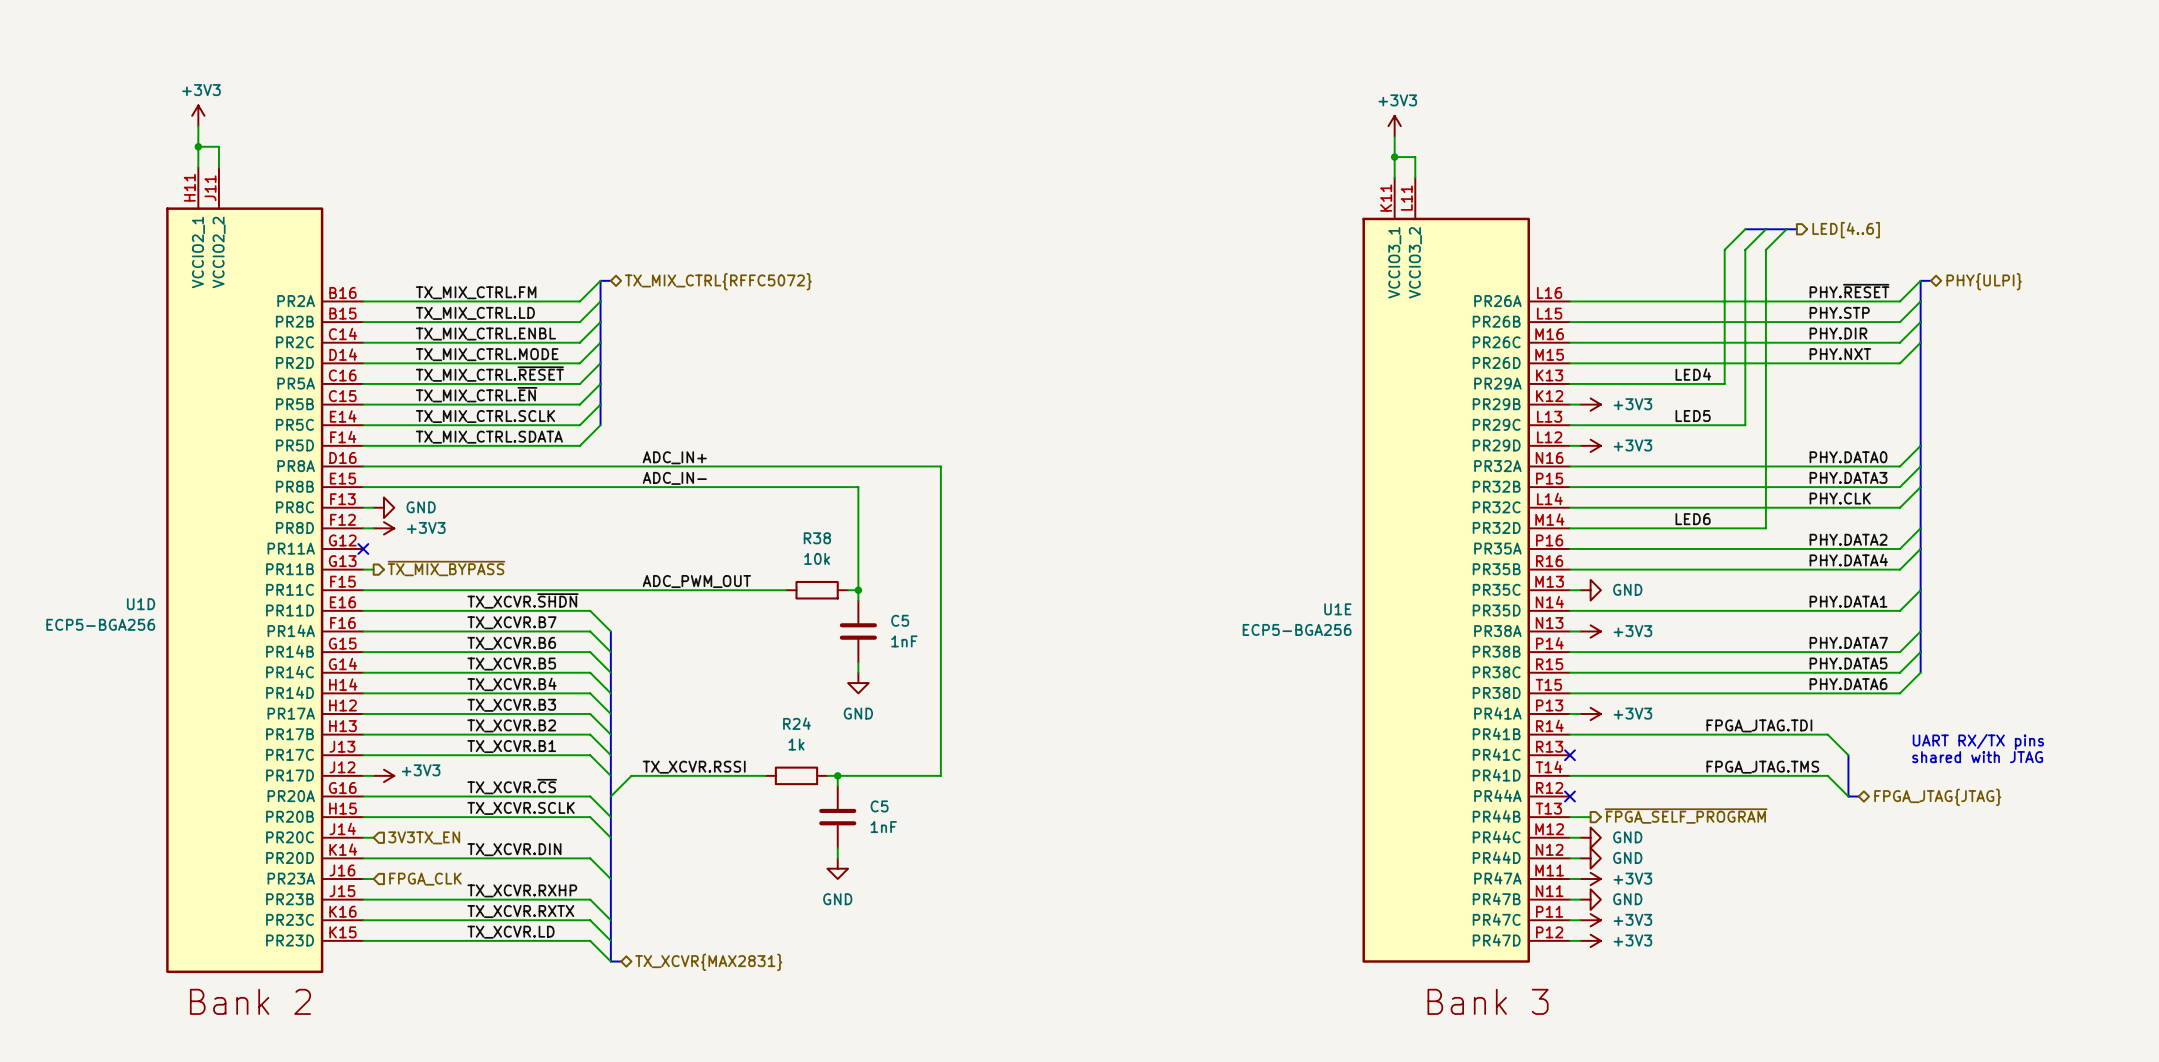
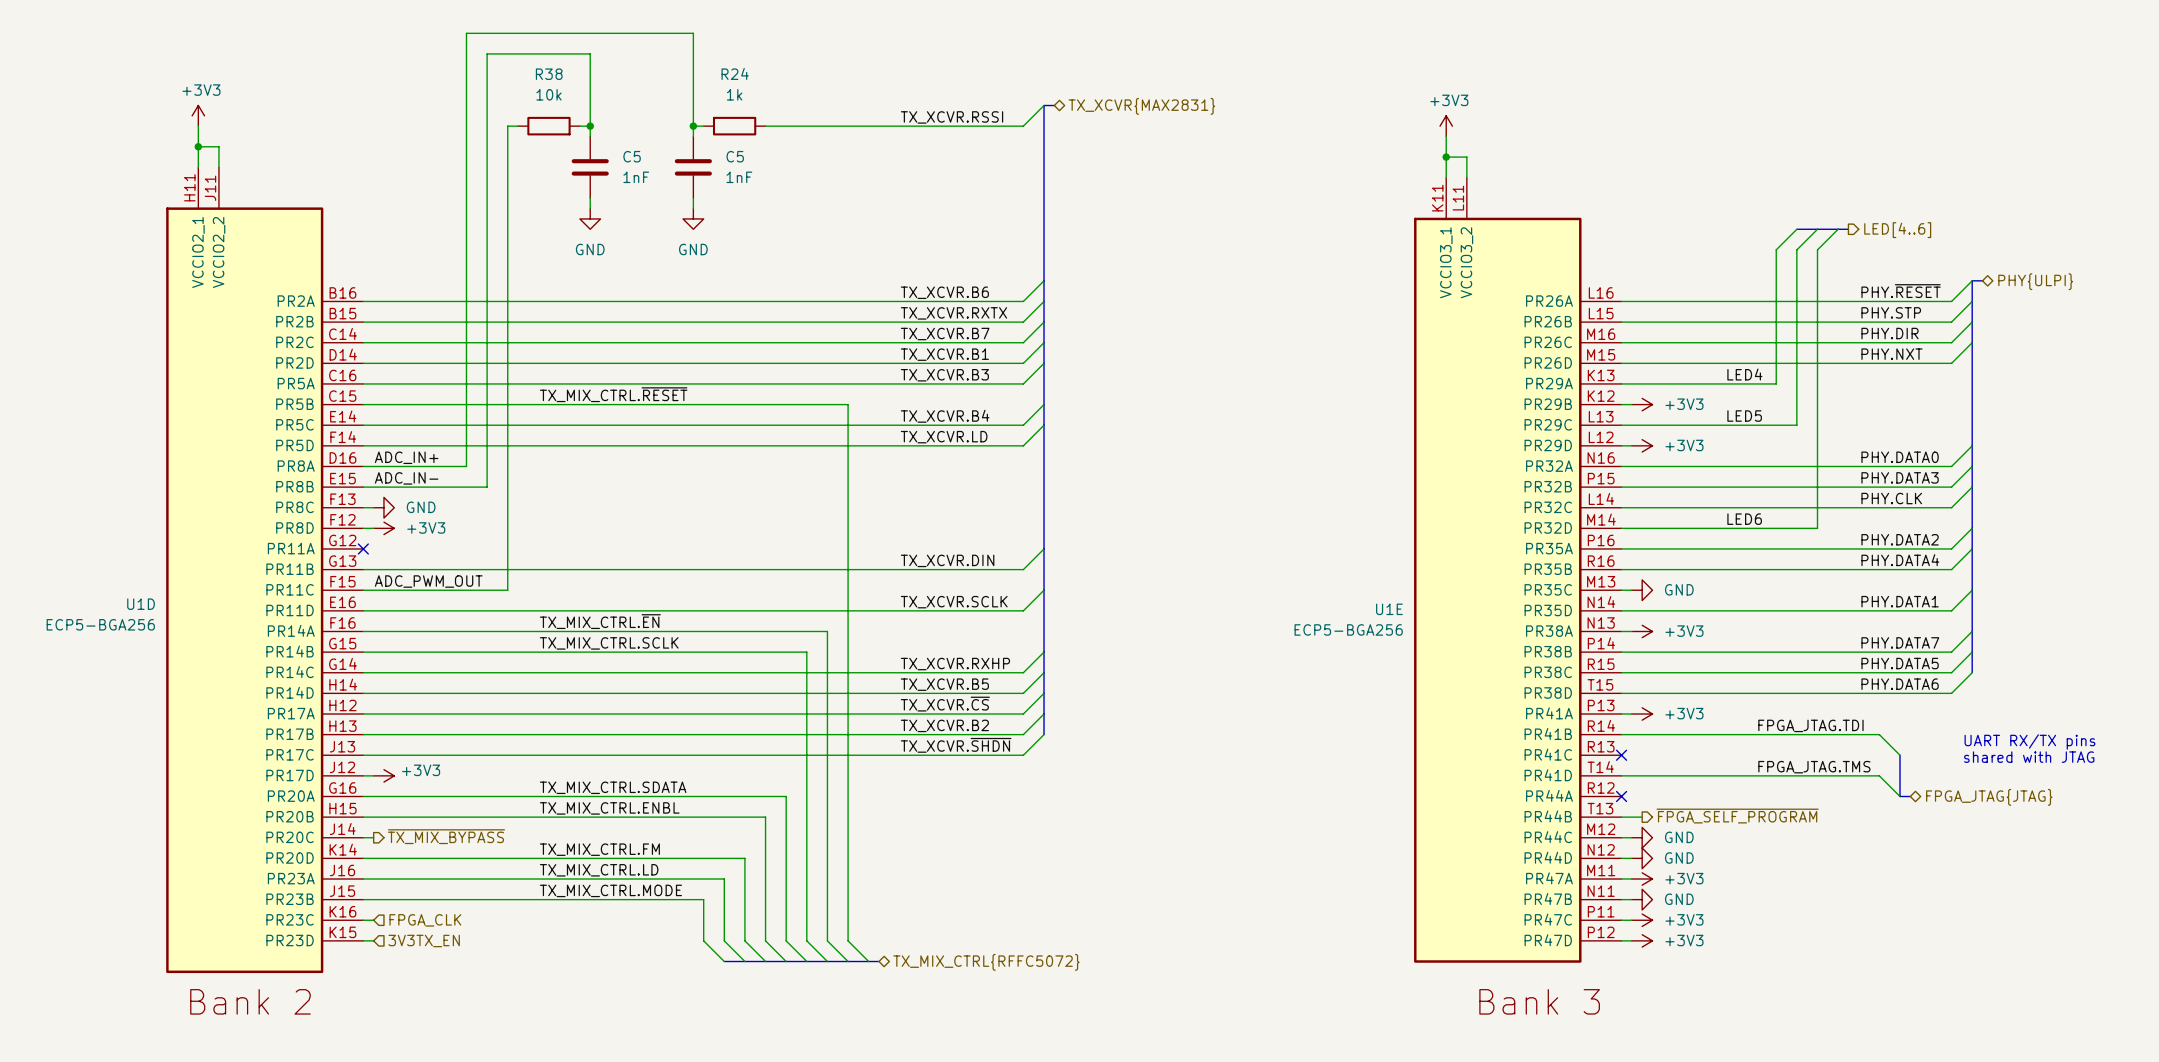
wire: none -> (1044, 105) (1023, 126) (765, 126)
bus: none -> (1054, 105) (1044, 105) (1044, 734)
hierarchical label: none -> TX_XCVR{MAX2831} (1141, 106)
label: none -> TX_XCVR.RSSI (952, 117)
wire: none -> (579, 126) (590, 126)
junction: none -> (590, 126)
wire: none -> (693, 126) (703, 126)
junction: none -> (693, 126)
power symbol position: +3V3 (1394, 126) -> +3V3 (1446, 126)
wire: (1394, 136) (1394, 177) -> (1446, 136) (1446, 177)
wire: (1394, 157) (1415, 157) (1415, 177) -> (1446, 157) (1466, 157) (1466, 177)
junction: (1394, 157) -> none
junction: none -> (1446, 157)
C5: none -> 1nF (590, 167)
C5: none -> 1nF (693, 167)
wire: none -> (590, 198) (590, 208)
wire: none -> (693, 198) (693, 208)
power symbol: none -> GND (590, 218)
power symbol: none -> GND (693, 218)
wire: (1745, 229) (1724, 249) (1724, 383) -> (1796, 229) (1776, 249) (1776, 383) (1724, 383)
bus: (1745, 229) (1796, 229) -> (1848, 229) (1796, 229)
wire: (1765, 229) (1745, 249) (1745, 425) -> (1817, 229) (1796, 249) (1796, 425) (1745, 425)
wire: (1786, 229) (1765, 249) (1765, 528) -> (1838, 229) (1817, 249) (1817, 528) (1765, 528)
hierarchical label position: LED[4..6] (1846, 230) -> LED[4..6] (1897, 230)
wire: (600, 280) (579, 301) -> (1044, 280) (1023, 301) (579, 301)
bus: (610, 280) (600, 280) (600, 425) -> none
wire: (1920, 280) (1900, 301) -> (1972, 280) (1951, 301) (1900, 301)
bus: (1930, 280) (1920, 280) (1920, 672) -> (1982, 280) (1972, 280) (1972, 672)
hierarchical label: TX_MIX_CTRL{RFFC5072} (718, 281) -> none
hierarchical label position: PHY{ULPI} (1984, 281) -> PHY{ULPI} (2035, 281)
label position: PHY.~{RESET} (1849, 291) -> PHY.~{RESET} (1901, 291)
label: TX_MIX_CTRL.FM (476, 292) -> none
label: none -> TX_XCVR.B6 (944, 292)
wire: (600, 301) (579, 322) -> (1044, 301) (1023, 322) (579, 322)
wire: (1920, 301) (1900, 322) -> (1972, 301) (1951, 322) (1900, 322)
label position: PHY.STP (1839, 312) -> PHY.STP (1891, 312)
label: TX_MIX_CTRL.LD (475, 313) -> none
label: none -> TX_XCVR.RXTX (953, 313)
wire: (600, 322) (579, 342) -> (1044, 322) (1023, 342) (579, 342)
wire: (1920, 322) (1900, 342) -> (1972, 322) (1951, 342) (1900, 342)
label position: PHY.DIR (1838, 333) -> PHY.DIR (1890, 333)
label: TX_MIX_CTRL.ENBL (485, 334) -> none
label: none -> TX_XCVR.B7 (945, 334)
wire: (600, 342) (579, 363) -> (1044, 342) (1023, 363) (579, 363)
wire: (1920, 342) (1900, 363) -> (1972, 342) (1951, 363) (1900, 363)
label: TX_MIX_CTRL.MODE (487, 354) -> none
label: none -> TX_XCVR.B1 (944, 354)
label position: PHY.NXT (1840, 354) -> PHY.NXT (1891, 354)
wire: (600, 363) (579, 383) -> (1044, 363) (1023, 383) (579, 383)
label position: TX_MIX_CTRL.~{RESET} (489, 374) -> TX_MIX_CTRL.~{RESET} (613, 394)
label position: LED4 (1693, 374) -> LED4 (1744, 374)
label: none -> TX_XCVR.B3 (944, 375)
wire: (600, 383) (579, 404) -> (868, 961) (848, 940) (848, 404) (579, 404)
label: TX_MIX_CTRL.~{EN} (476, 394) -> none
wire: (600, 404) (579, 425) -> (1044, 404) (1023, 425) (579, 425)
power symbol: +3V3 (1590, 404) -> none
power symbol: none -> +3V3 (1642, 404)
label: TX_MIX_CTRL.SCLK (485, 416) -> none
label: none -> TX_XCVR.B4 (945, 416)
label position: LED5 (1693, 416) -> LED5 (1744, 416)
wire: (600, 425) (579, 445) -> (1044, 425) (1023, 445) (579, 445)
label: TX_MIX_CTRL.SDATA (489, 437) -> none
label: none -> TX_XCVR.LD (944, 437)
power symbol: +3V3 (1590, 445) -> none
power symbol: none -> +3V3 (1642, 445)
wire: (1920, 445) (1900, 466) -> (1972, 445) (1951, 466) (1900, 466)
label: none -> ADC_IN+ (406, 457)
label: ADC_IN+ (674, 457) -> none
label position: PHY.DATA0 (1848, 457) -> PHY.DATA0 (1900, 457)
wire: (466, 466) (940, 466) (940, 775) (827, 775) -> (466, 466) (466, 33) (693, 33) (693, 136)
wire: (1920, 466) (1900, 487) -> (1972, 466) (1951, 487) (1900, 487)
label position: PHY.DATA3 (1848, 477) -> PHY.DATA3 (1900, 477)
label: none -> ADC_IN- (406, 478)
label: ADC_IN- (674, 478) -> none
wire: (487, 487) (858, 487) (858, 600) -> (487, 487) (487, 53) (590, 53) (590, 136)
wire: (1920, 487) (1900, 507) -> (1972, 487) (1951, 507) (1900, 507)
label position: PHY.CLK (1840, 498) -> PHY.CLK (1891, 498)
label position: LED6 (1693, 519) -> LED6 (1744, 519)
wire: (1920, 528) (1900, 548) -> (1972, 528) (1951, 548) (1900, 548)
label position: PHY.DATA2 (1848, 539) -> PHY.DATA2 (1900, 539)
wire: none -> (1044, 548) (1023, 569) (373, 569)
wire: (1920, 548) (1900, 569) -> (1972, 548) (1951, 569) (1900, 569)
label: none -> TX_XCVR.DIN (947, 560)
label position: PHY.DATA4 (1848, 560) -> PHY.DATA4 (1900, 560)
hierarchical label: ~{TX_MIX_BYPASS} (446, 568) -> none
U1E position: (1466, 570) -> (1517, 570)
label: none -> ADC_PWM_OUT (428, 581)
label: ADC_PWM_OUT (696, 581) -> none
wire: (507, 590) (786, 590) -> (507, 590) (507, 126) (518, 126)
R38 position: (817, 590) -> (548, 126)
wire: (848, 590) (858, 590) -> none
junction: (858, 590) -> none
power symbol position: GND (1590, 590) -> GND (1642, 590)
wire: (1920, 590) (1900, 610) -> (1972, 590) (1951, 610) (1900, 610)
label: TX_XCVR.~{SHDN} (523, 600) -> TX_MIX_CTRL.~{EN} (600, 621)
label position: PHY.DATA1 (1848, 601) -> PHY.DATA1 (1900, 601)
label: none -> TX_XCVR.SCLK (954, 602)
wire: (590, 610) (610, 631) -> (590, 610) (1023, 610) (1044, 590)
label: TX_XCVR.B7 (511, 622) -> none
wire: (590, 631) (610, 652) -> (590, 631) (827, 631) (827, 940) (848, 961)
bus: (610, 631) (610, 961) (621, 961) -> none
C5: 1nF (858, 631) -> none
power symbol: +3V3 (1590, 631) -> none
power symbol: none -> +3V3 (1642, 631)
wire: (1920, 631) (1900, 652) -> (1972, 631) (1951, 652) (1900, 652)
label position: PHY.DATA7 (1848, 642) -> PHY.DATA7 (1900, 642)
label: TX_XCVR.B6 (511, 643) -> none
label: none -> TX_MIX_CTRL.SCLK (609, 643)
wire: (590, 652) (610, 672) -> (590, 652) (806, 652) (806, 940) (827, 961)
wire: (1920, 652) (1900, 672) -> (1972, 652) (1951, 672) (1900, 672)
wire: (858, 662) (858, 672) -> none
label position: PHY.DATA5 (1848, 663) -> PHY.DATA5 (1900, 663)
label: TX_XCVR.B5 (511, 664) -> none
label: none -> TX_XCVR.RXHP (955, 664)
wire: (590, 672) (610, 693) -> (590, 672) (1023, 672) (1044, 652)
wire: (1920, 672) (1900, 693) -> (1972, 672) (1951, 693) (1900, 693)
power symbol: GND (858, 683) -> none
label: TX_XCVR.B4 (511, 684) -> none
label: none -> TX_XCVR.B5 (944, 684)
label position: PHY.DATA6 (1848, 684) -> PHY.DATA6 (1900, 684)
wire: (590, 693) (610, 713) -> (590, 693) (1023, 693) (1044, 672)
label: none -> TX_XCVR.~{CS} (945, 704)
label: TX_XCVR.B3 (511, 705) -> none
wire: (590, 713) (610, 734) -> (590, 713) (1023, 713) (1044, 693)
power symbol: +3V3 (1590, 713) -> none
power symbol: none -> +3V3 (1642, 713)
label: TX_XCVR.B2 (511, 725) -> none
label: none -> TX_XCVR.B2 (944, 725)
label position: FPGA_JTAG.TDI (1759, 725) -> FPGA_JTAG.TDI (1810, 725)
wire: (590, 734) (610, 755) -> (590, 734) (1023, 734) (1044, 713)
wire: (1827, 734) (1848, 755) -> (1827, 734) (1879, 734) (1900, 755)
text position: UART RX/TX pins (1978, 741) -> UART RX/TX pins (2029, 741)
label: none -> TX_XCVR.~{SHDN} (956, 745)
label: TX_XCVR.B1 (511, 746) -> none
wire: (590, 755) (610, 775) -> (590, 755) (1023, 755) (1044, 734)
no-connect mark: (1569, 755) -> none
no-connect mark: none -> (1621, 755)
bus: (1848, 755) (1848, 796) (1858, 796) -> (1900, 755) (1900, 796) (1910, 796)
text position: shared with JTAG (1977, 757) -> shared with JTAG (2029, 757)
label: TX_XCVR.RSSI (694, 767) -> none
label position: FPGA_JTAG.TMS (1762, 767) -> FPGA_JTAG.TMS (1814, 767)
wire: (765, 775) (631, 775) (610, 796) -> none
R24 position: (796, 775) -> (734, 126)
wire: (837, 775) (837, 786) -> none
junction: (837, 775) -> none
wire: (1827, 775) (1848, 796) -> (1827, 775) (1879, 775) (1900, 796)
label: TX_XCVR.~{CS} (512, 786) -> none
label: none -> TX_MIX_CTRL.SDATA (613, 787)
wire: (590, 796) (610, 817) -> (590, 796) (786, 796) (786, 940) (806, 961)
no-connect mark: (1569, 796) -> none
no-connect mark: none -> (1621, 796)
hierarchical label position: FPGA_JTAG{JTAG} (1937, 797) -> FPGA_JTAG{JTAG} (1989, 797)
label: TX_XCVR.SCLK (521, 808) -> none
label: none -> TX_MIX_CTRL.ENBL (609, 808)
hierarchical label position: ~{FPGA_SELF_PROGRAM} (1686, 816) -> ~{FPGA_SELF_PROGRAM} (1737, 816)
wire: (590, 817) (610, 837) -> (590, 817) (765, 817) (765, 940) (786, 961)
C5: 1nF (837, 817) -> none
hierarchical label shape: input (424, 837) -> output (446, 836)
hierarchical label: 3V3TX_EN (424, 837) -> ~{TX_MIX_BYPASS} (446, 836)
power symbol: GND (1590, 837) -> none
power symbol: none -> GND (1642, 837)
wire: (837, 848) (837, 858) -> none
label: TX_XCVR.DIN (514, 849) -> TX_MIX_CTRL.LD (599, 870)
label: none -> TX_MIX_CTRL.FM (599, 849)
wire: (590, 858) (610, 879) -> (590, 858) (744, 858) (744, 940) (765, 961)
power symbol: GND (1590, 858) -> none
power symbol: none -> GND (1642, 858)
power symbol: GND (837, 868) -> none
wire: none -> (373, 879) (724, 879) (724, 940) (744, 961)
hierarchical label position: FPGA_CLK (425, 879) -> FPGA_CLK (425, 920)
power symbol: +3V3 (1590, 879) -> none
power symbol: none -> +3V3 (1642, 879)
label: TX_XCVR.RXHP (522, 890) -> none
label: none -> TX_MIX_CTRL.MODE (610, 890)
wire: (590, 899) (610, 920) -> (590, 899) (703, 899) (703, 940) (724, 961)
power symbol: GND (1590, 899) -> none
power symbol: none -> GND (1642, 899)
label: TX_XCVR.RXTX (520, 911) -> none
wire: (373, 920) (590, 920) (610, 940) -> none
power symbol: +3V3 (1590, 920) -> none
power symbol: none -> +3V3 (1642, 920)
label: TX_XCVR.LD (511, 932) -> none
wire: (373, 940) (590, 940) (610, 961) -> none
hierarchical label: none -> 3V3TX_EN (424, 940)
power symbol: +3V3 (1590, 940) -> none
power symbol: none -> +3V3 (1642, 940)
bus: none -> (724, 961) (879, 961)
hierarchical label: TX_XCVR{MAX2831} (708, 962) -> none
hierarchical label: none -> TX_MIX_CTRL{RFFC5072} (986, 962)

